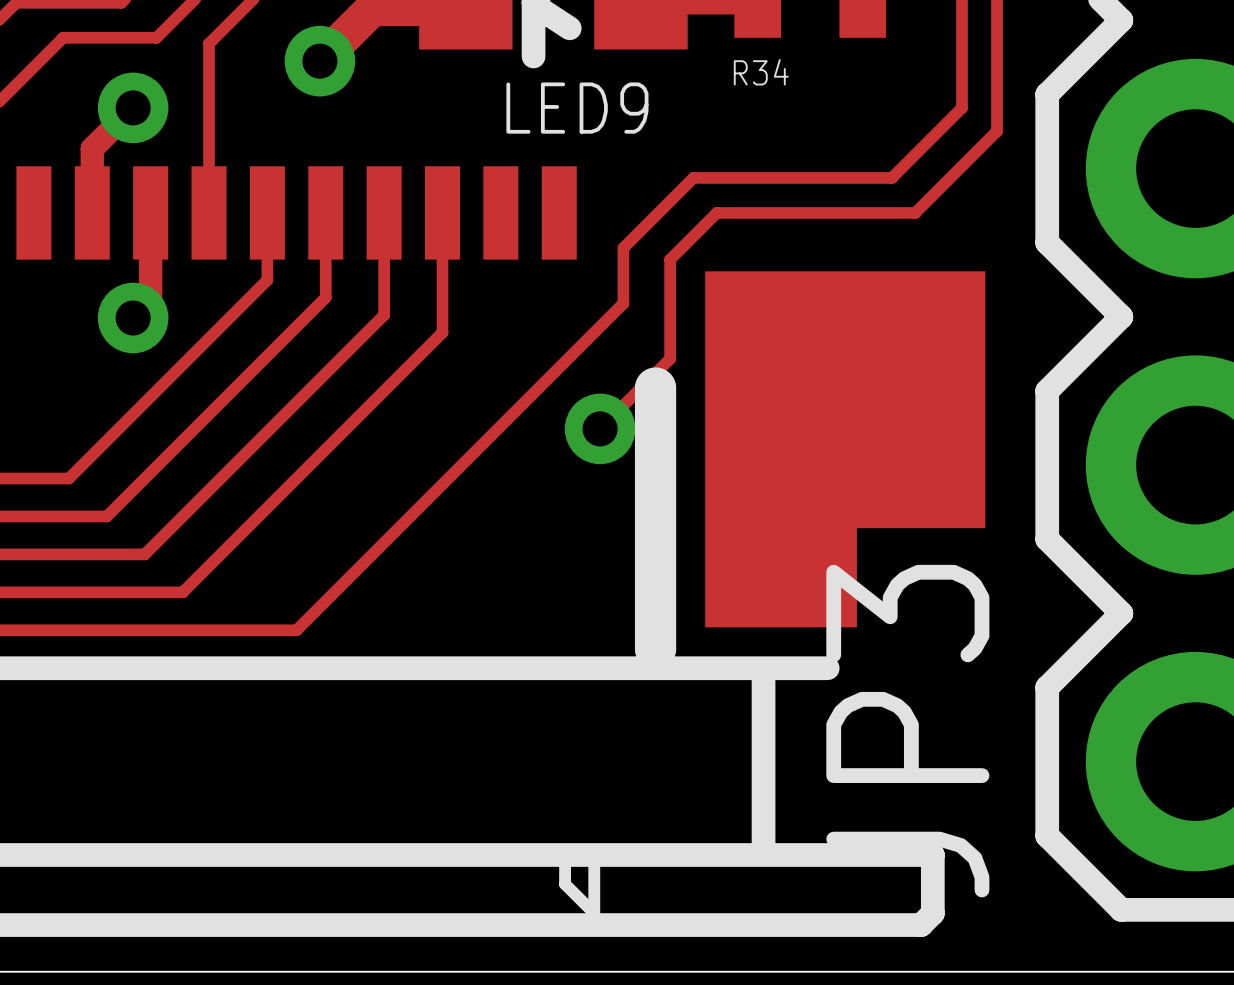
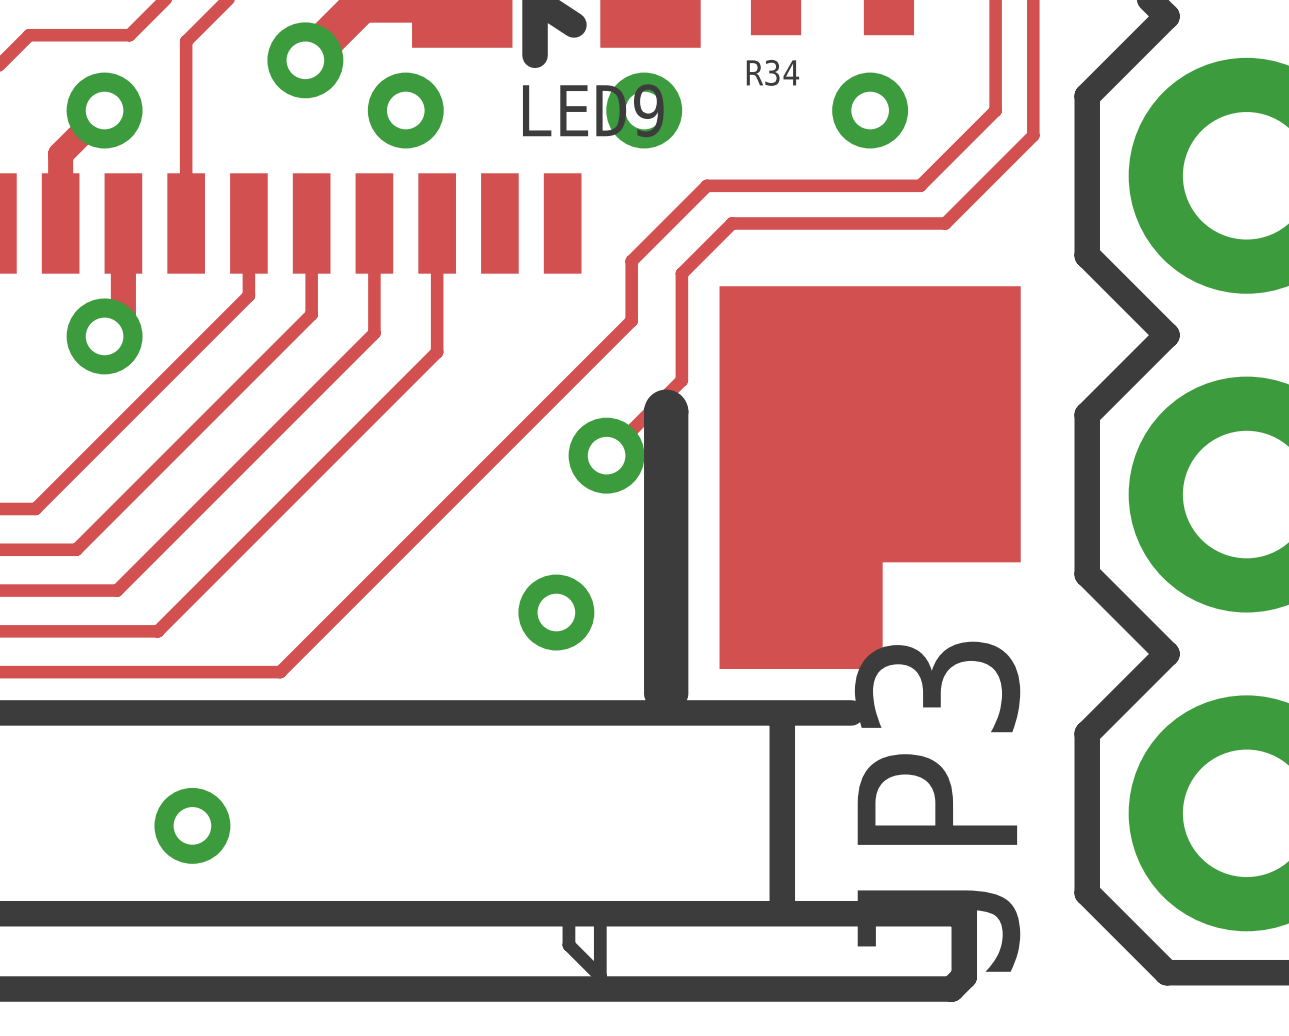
via: none -> (405, 110)
via: none -> (644, 110)
via: none -> (870, 110)
via: none -> (556, 612)
via: none -> (192, 825)

